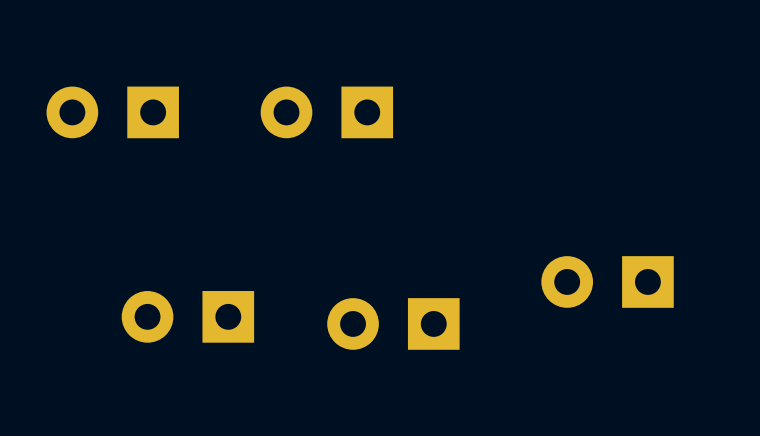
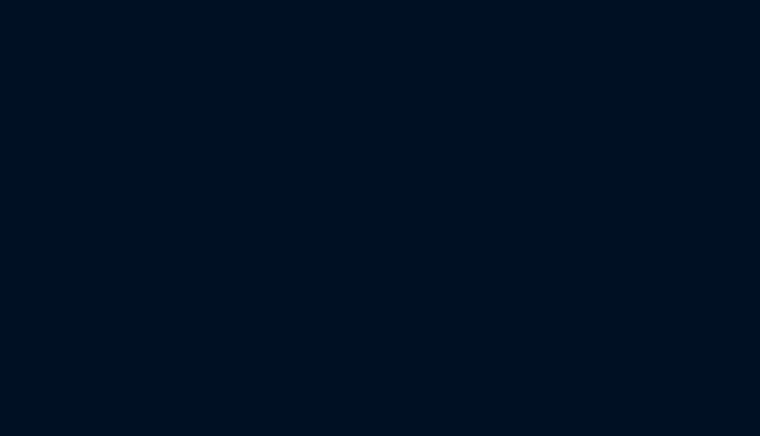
part: (112, 112) -> none
part: (326, 112) -> none
part: (607, 281) -> none
part: (187, 316) -> none
part: (393, 323) -> none

